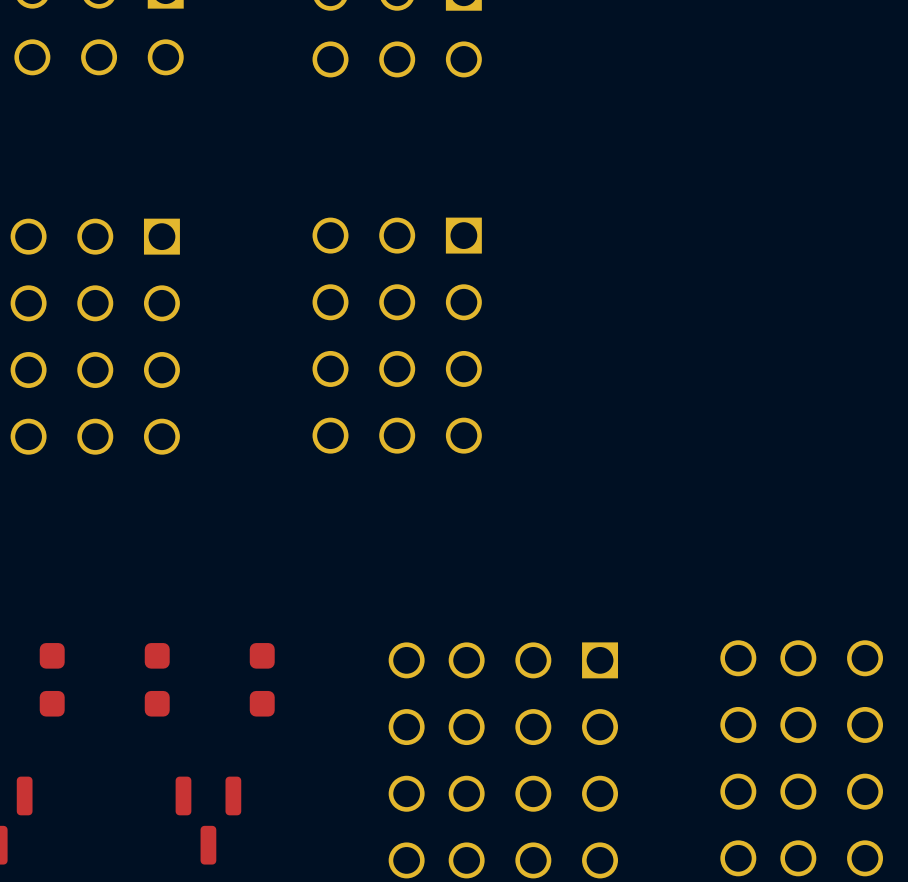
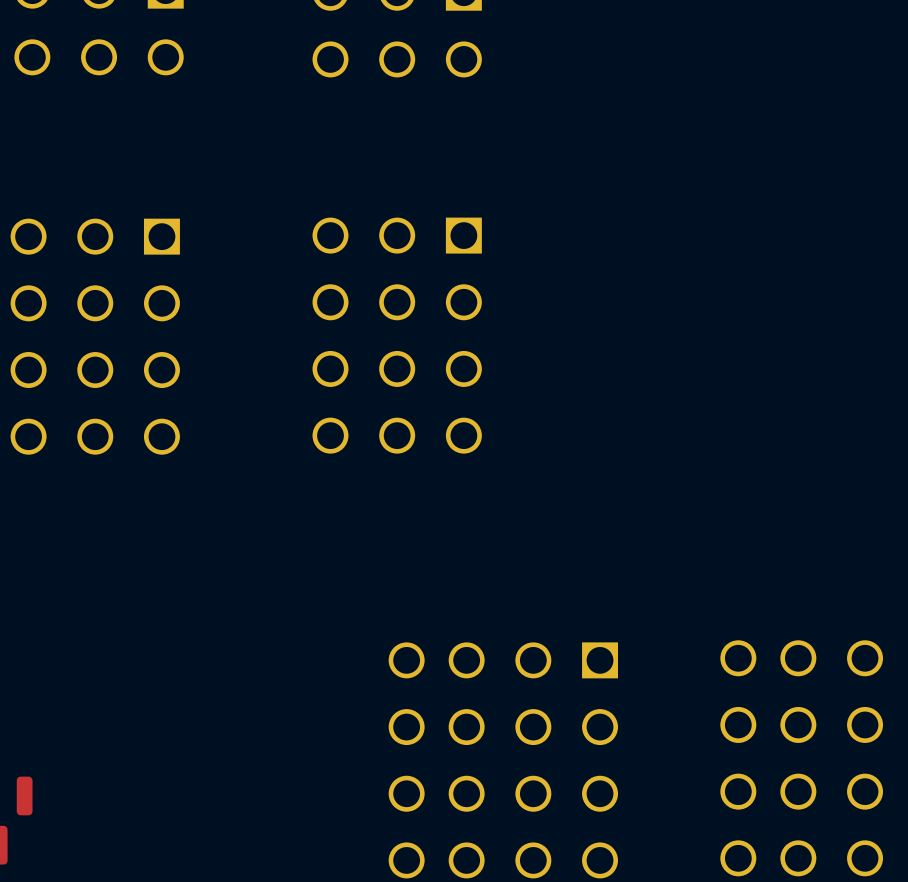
part: (52, 679) -> none
part: (157, 679) -> none
part: (262, 679) -> none
part: (208, 820) -> none

